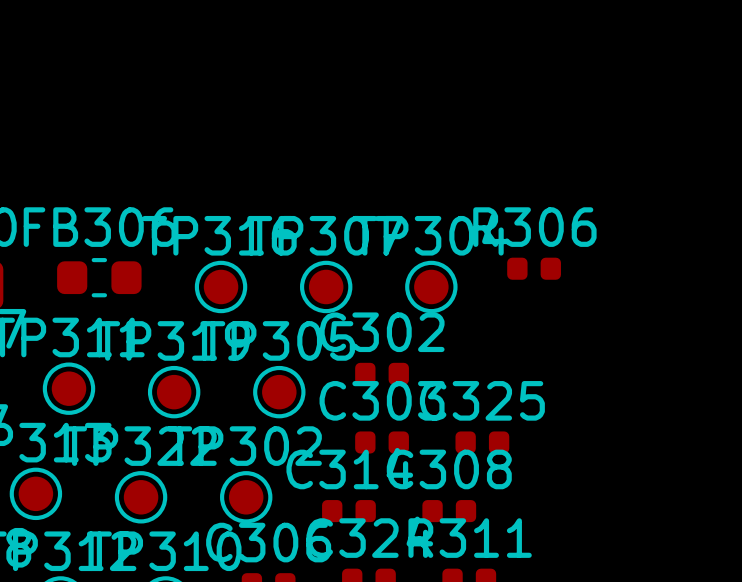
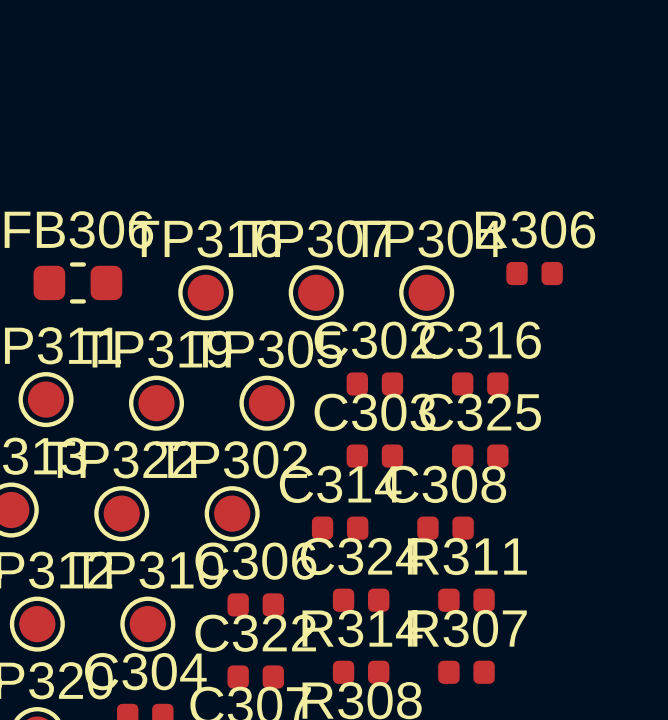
C316: none -> (480, 384)

